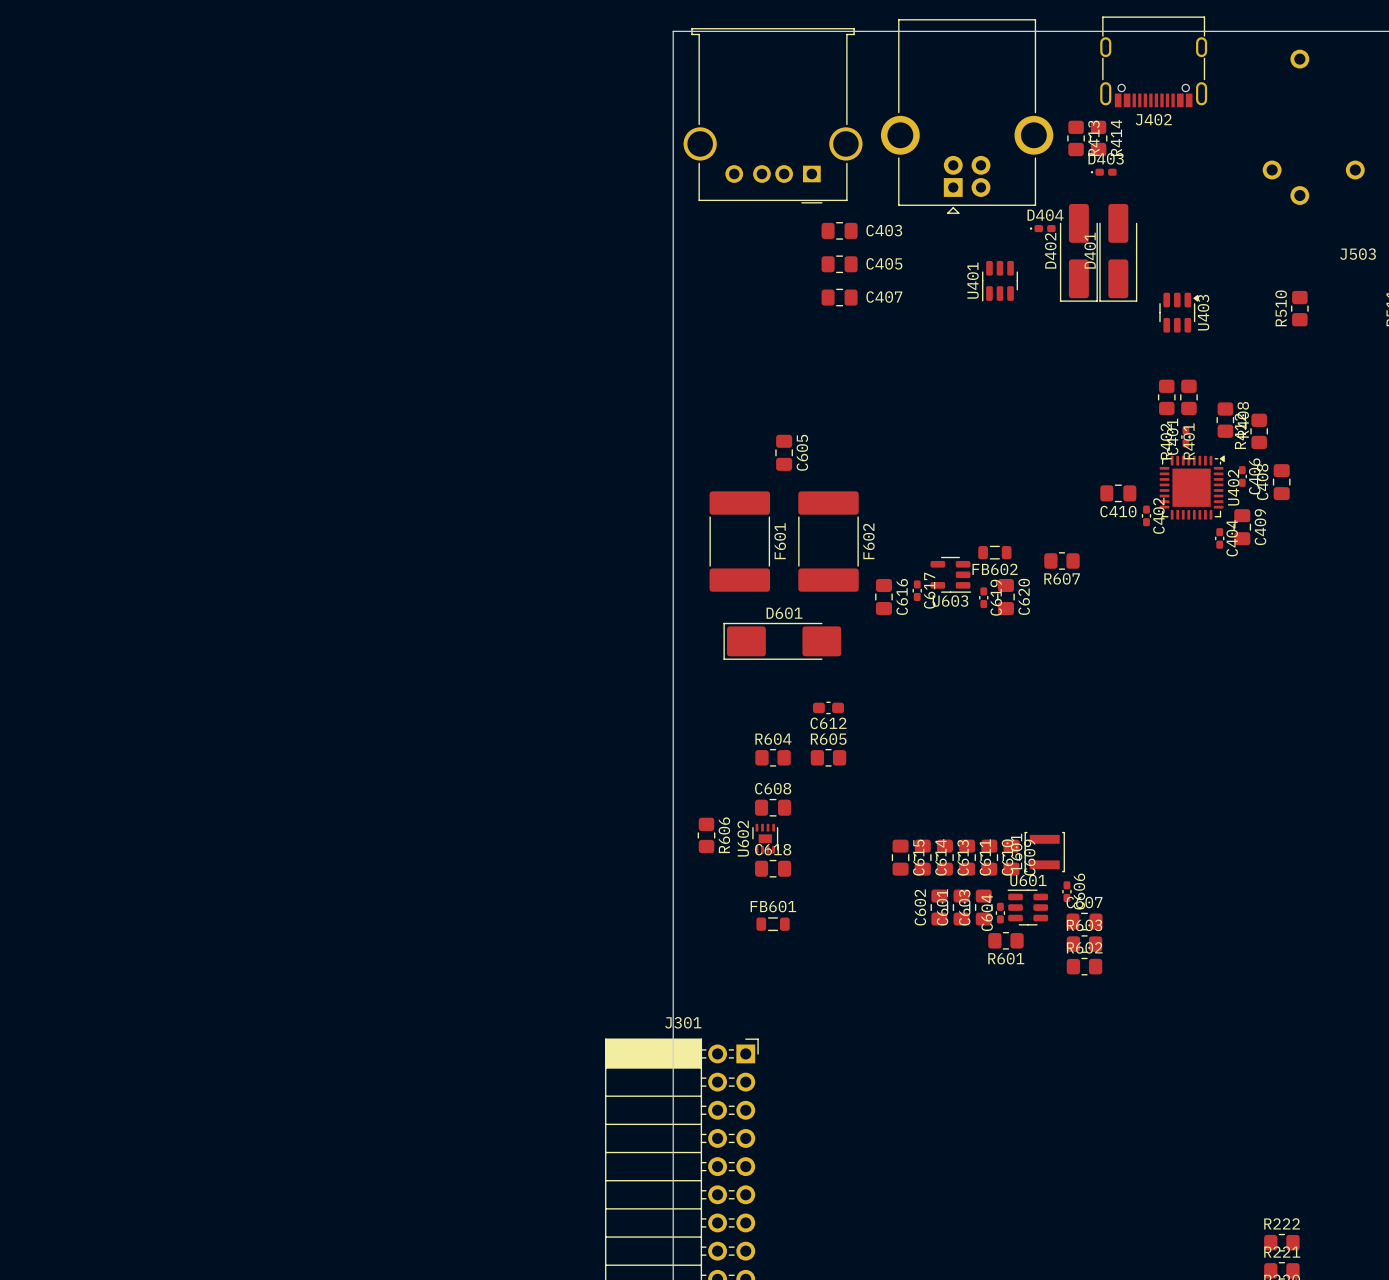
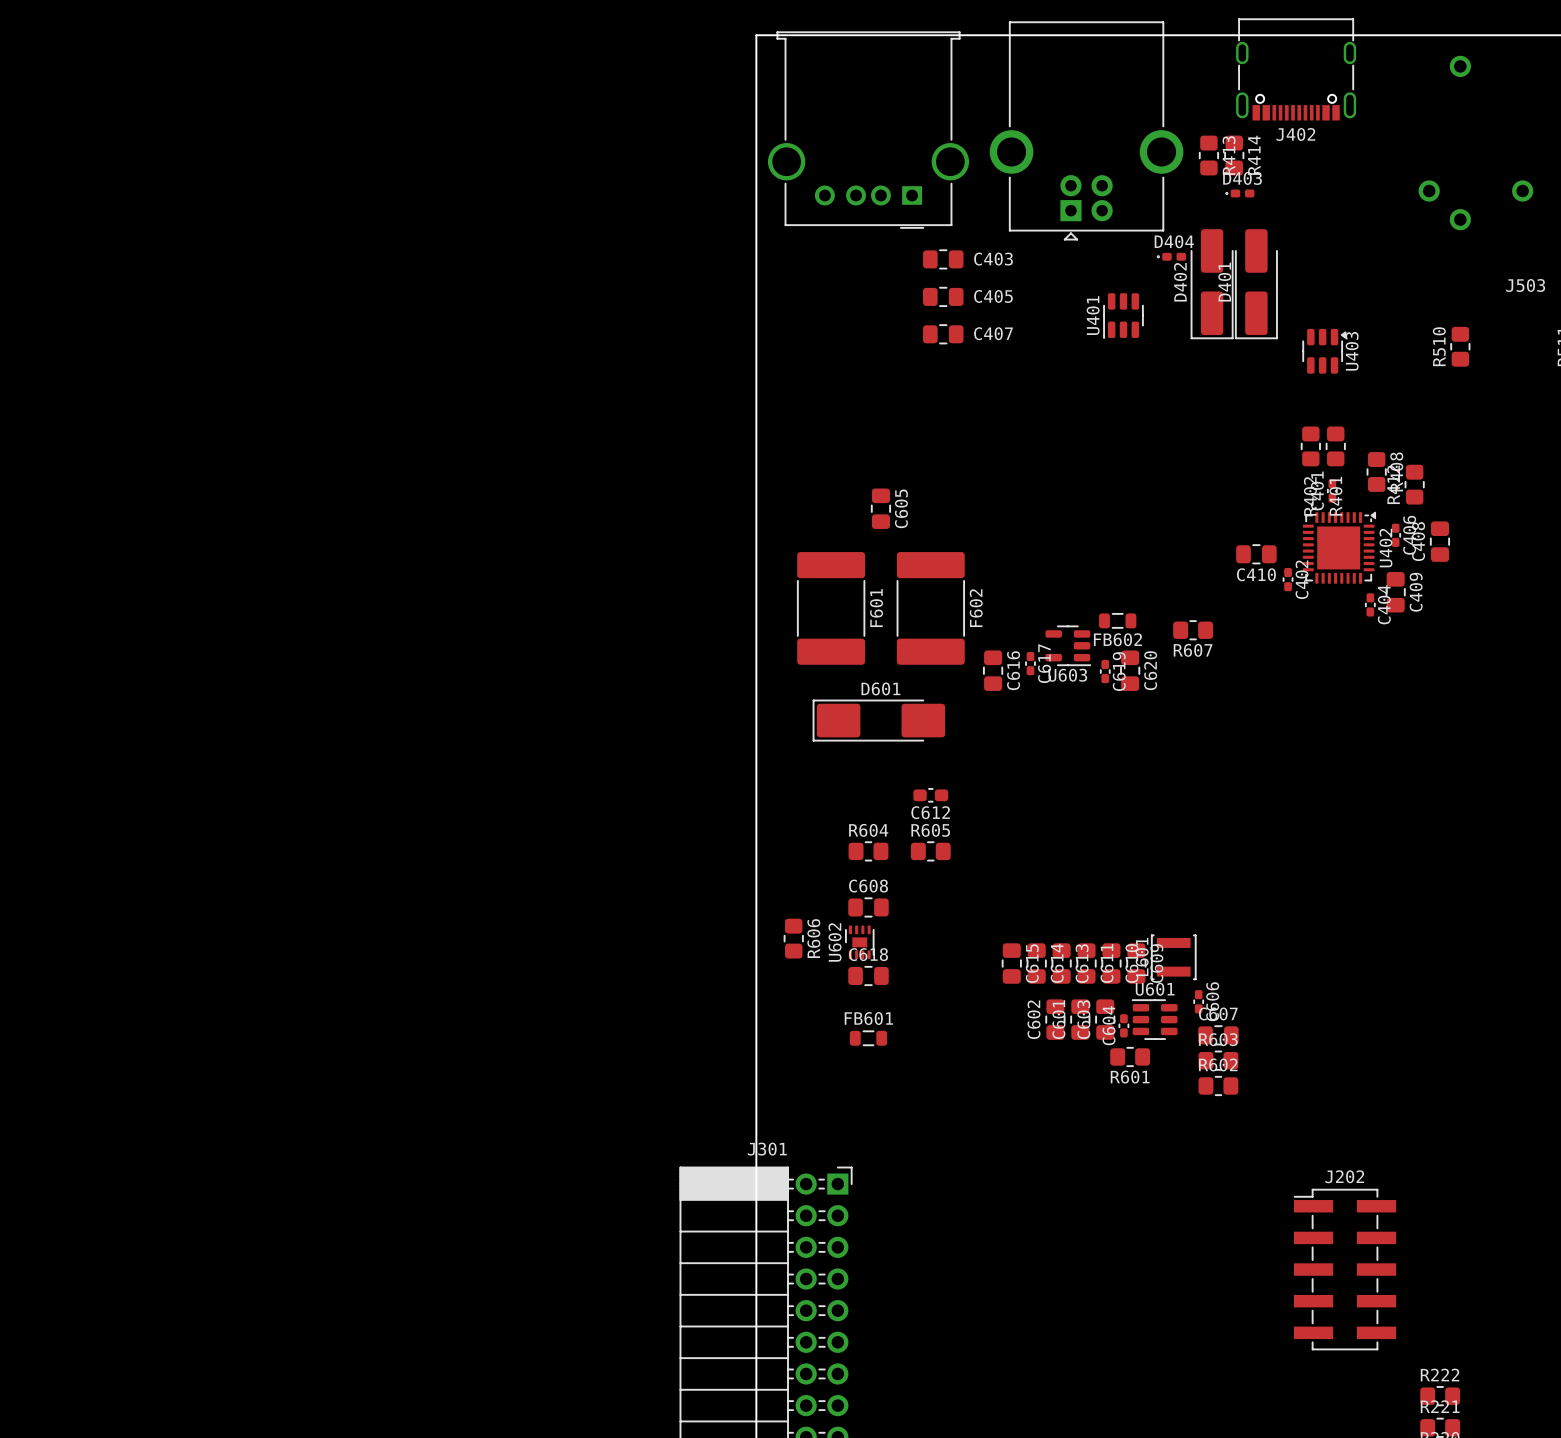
J202: none -> (1345, 1269)

